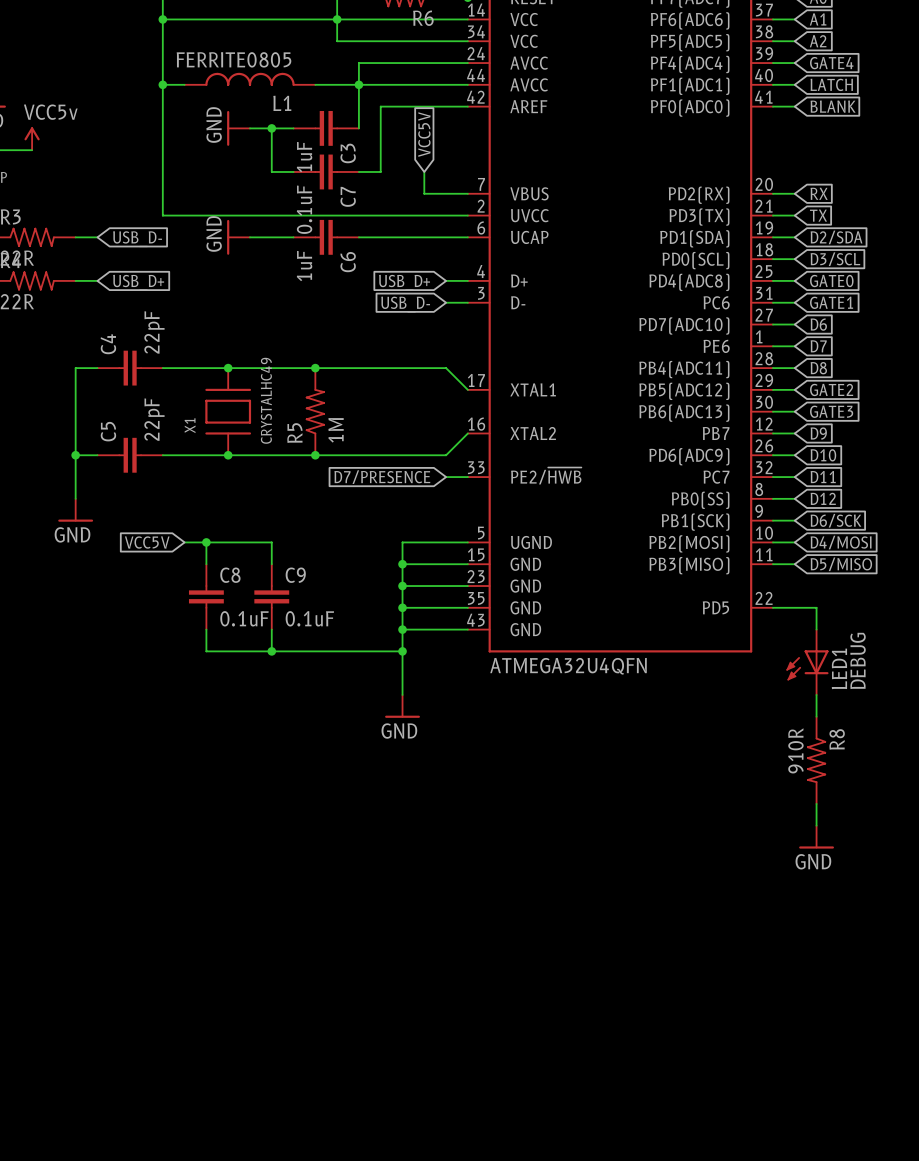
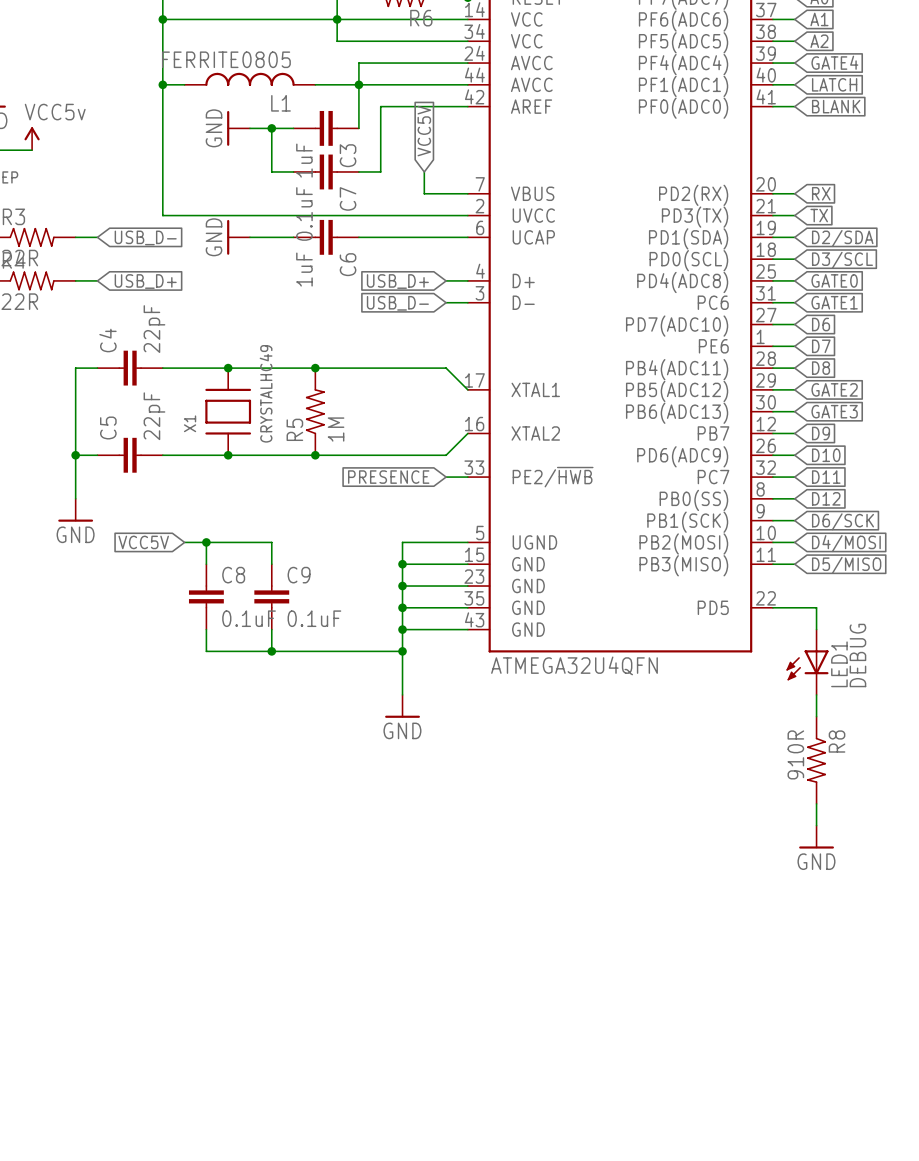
global label: D7/PRESENCE (382, 477) -> PRESENCE (388, 477)

